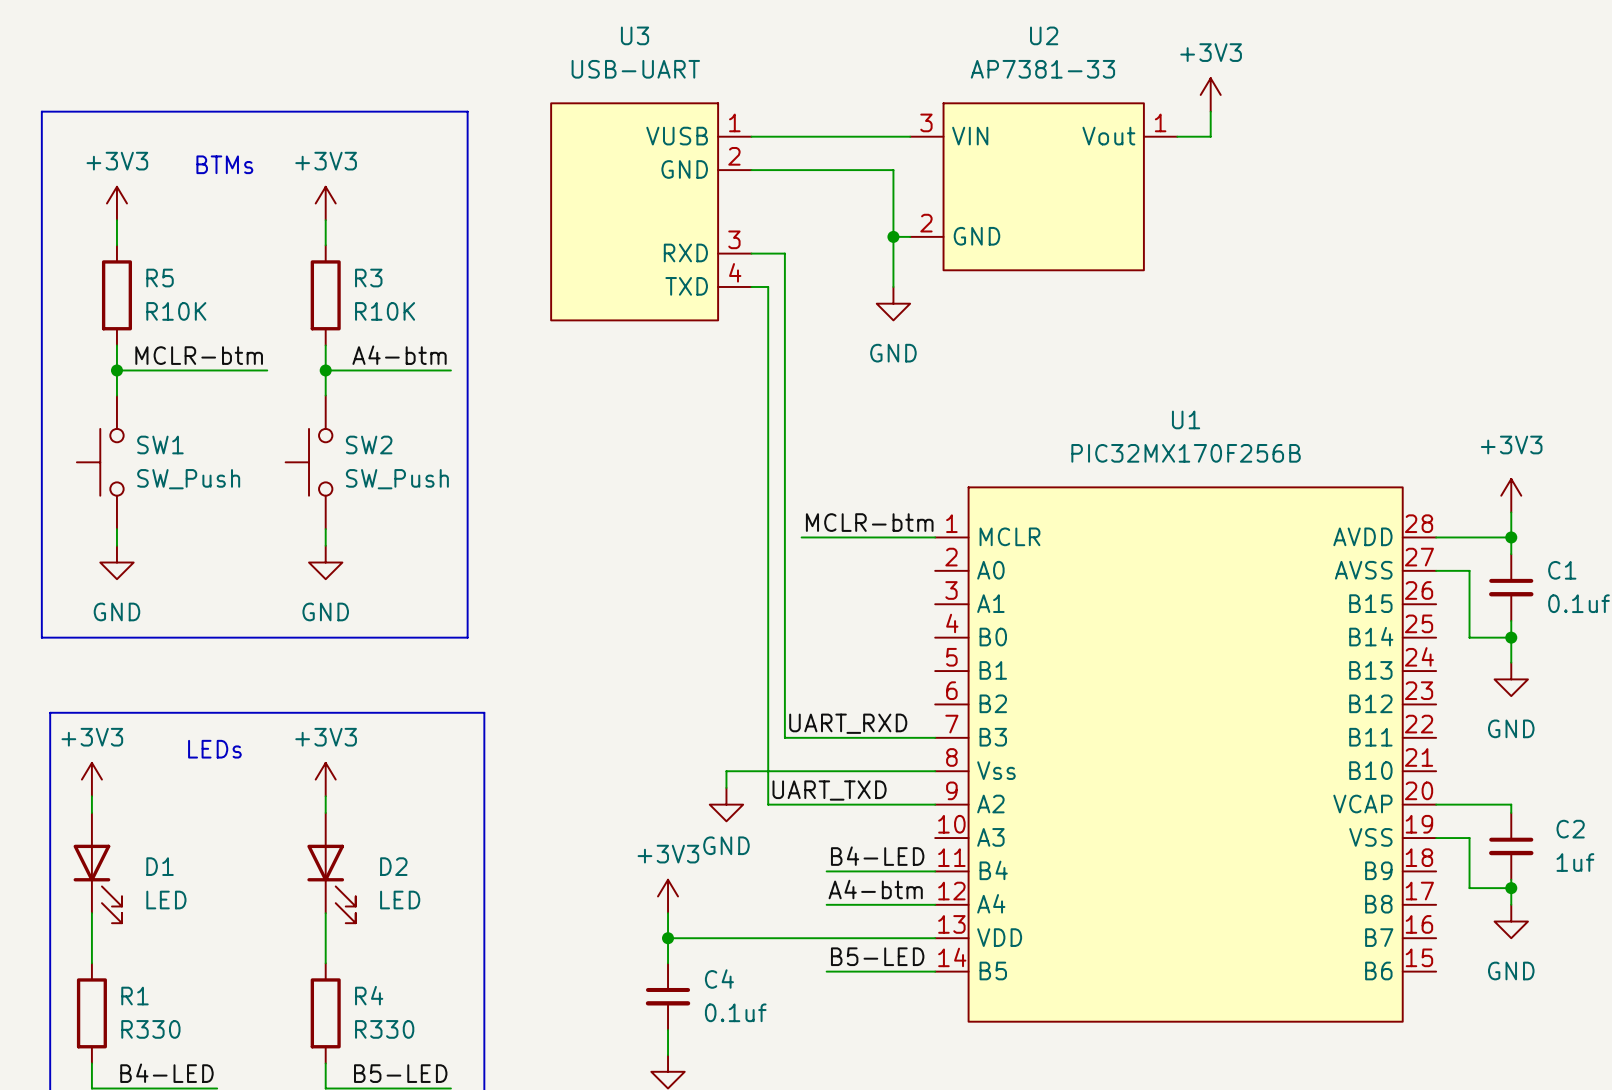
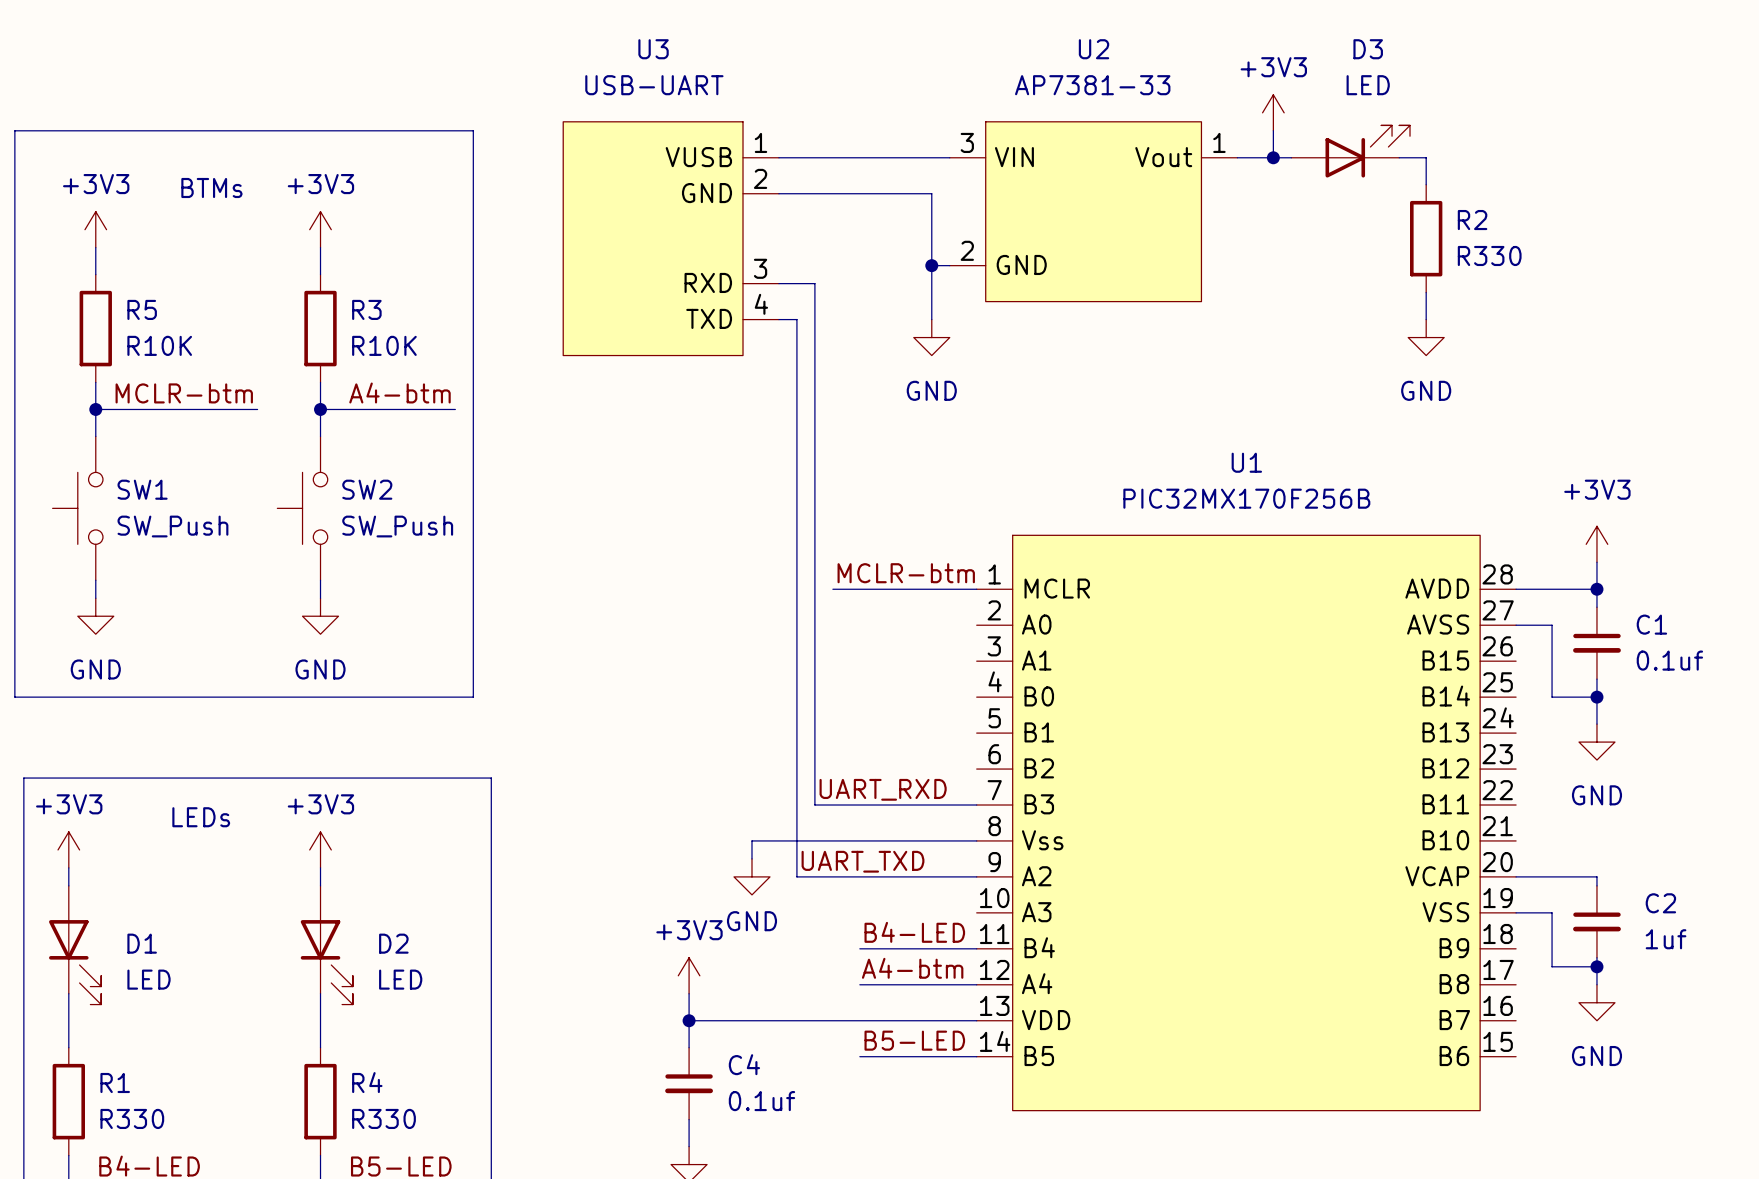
D3: none -> LED (1350, 151)
wire: none -> (1273, 157) (1291, 157)
junction: none -> (1273, 157)
wire: none -> (1399, 157) (1426, 157) (1426, 184)
R2: none -> R330 (1426, 238)
wire: none -> (1426, 292) (1426, 319)
power symbol: none -> GND (1426, 337)

